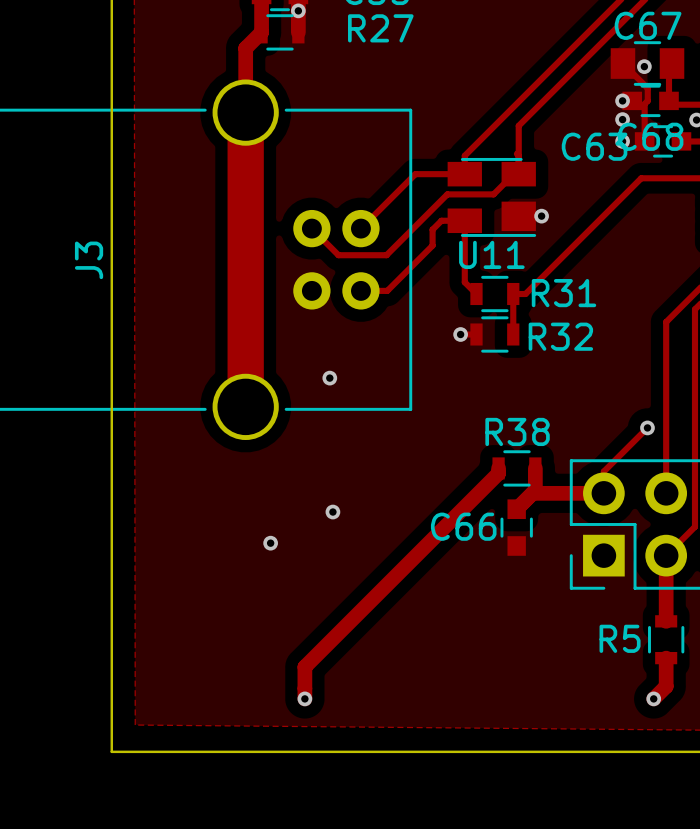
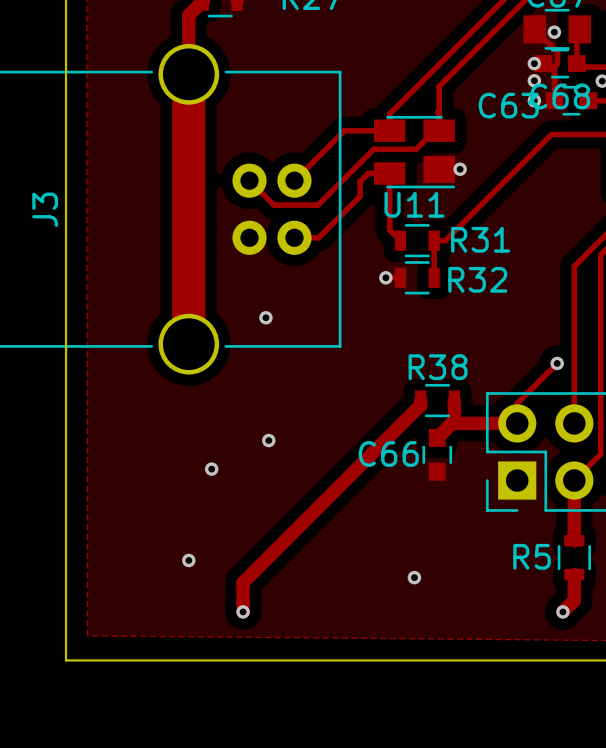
via: none -> (188, 560)
via: none -> (414, 577)

